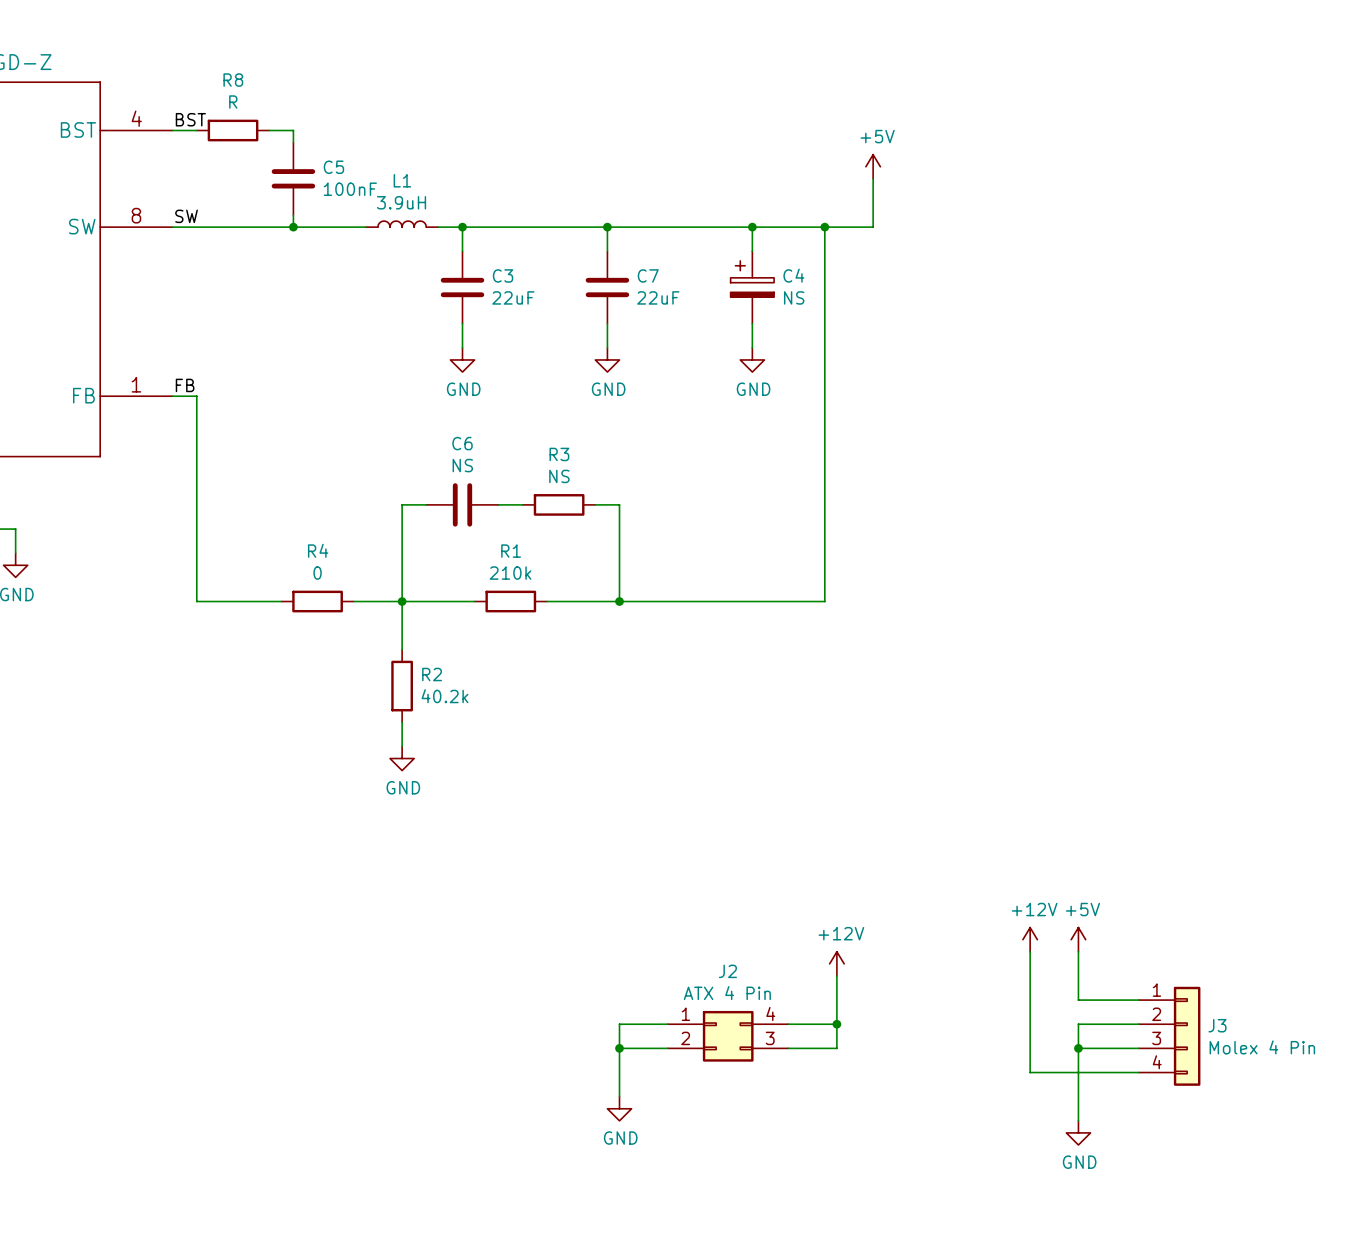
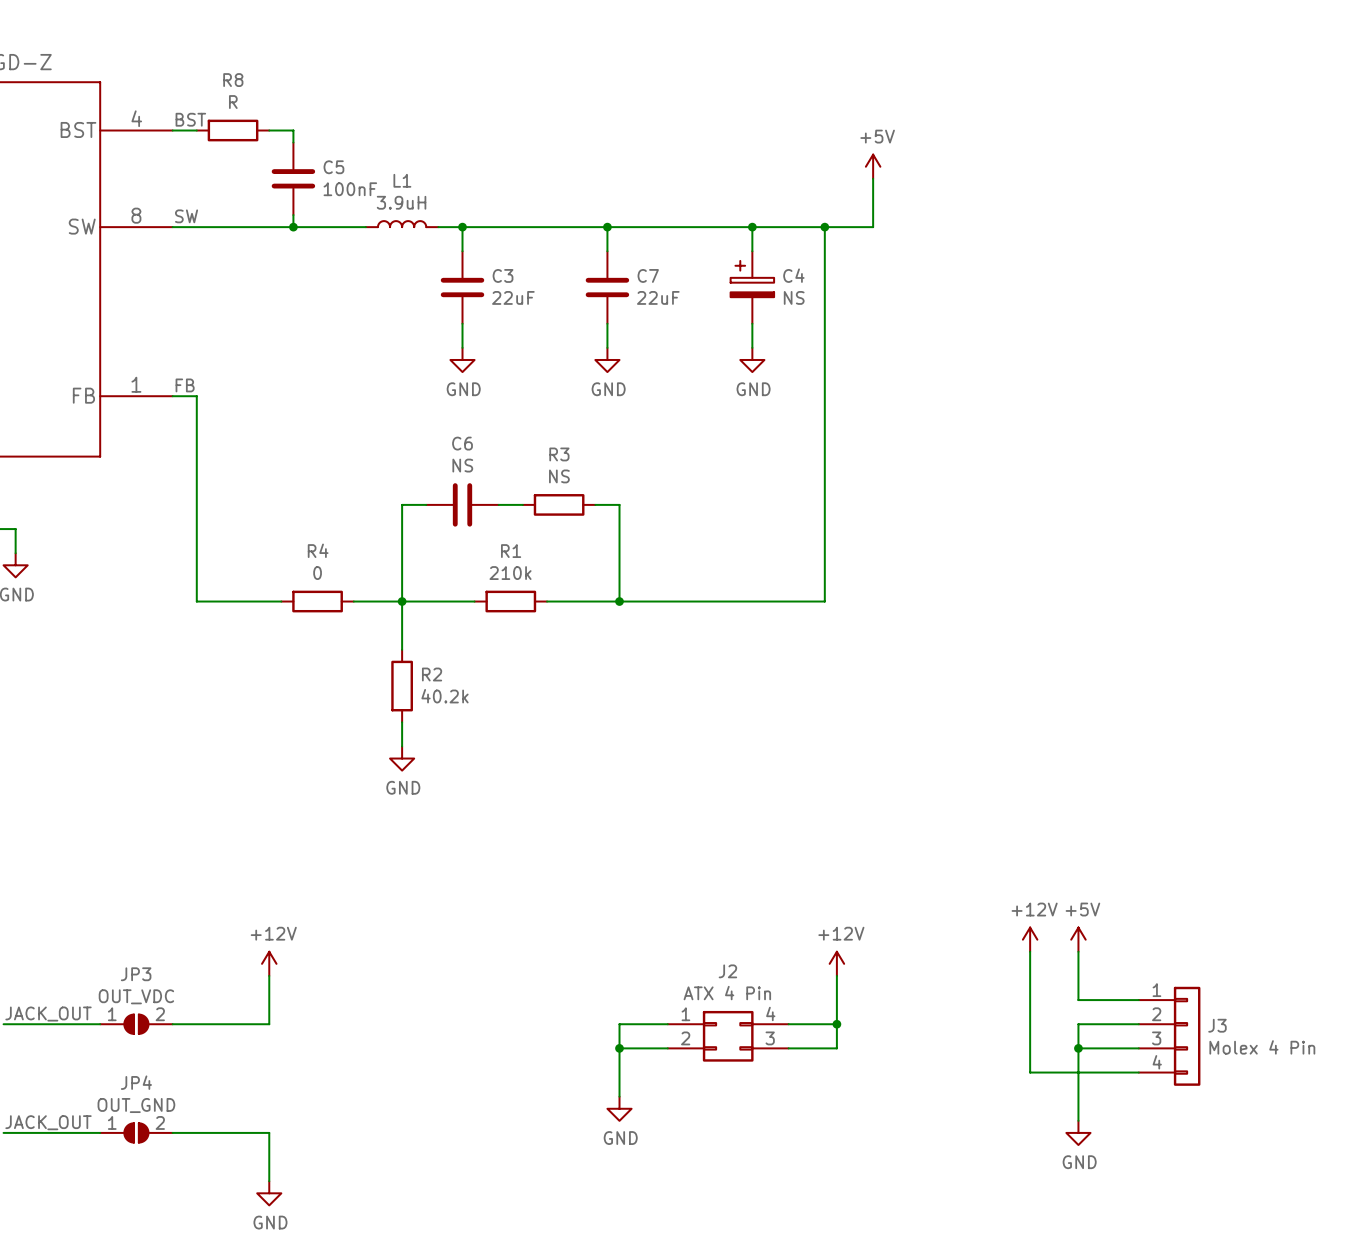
power symbol: none -> +12V (269, 963)
wire: none -> (269, 975) (269, 1024) (172, 1024)
label: none -> JACK_OUT (48, 1014)
wire: none -> (3, 1024) (100, 1024)
JP3: none -> OUT_VDC (136, 1024)
label: none -> JACK_OUT (48, 1122)
wire: none -> (3, 1132) (100, 1132)
JP4: none -> OUT_GND (136, 1132)
wire: none -> (172, 1132) (269, 1132) (269, 1181)
power symbol: none -> GND (269, 1193)

